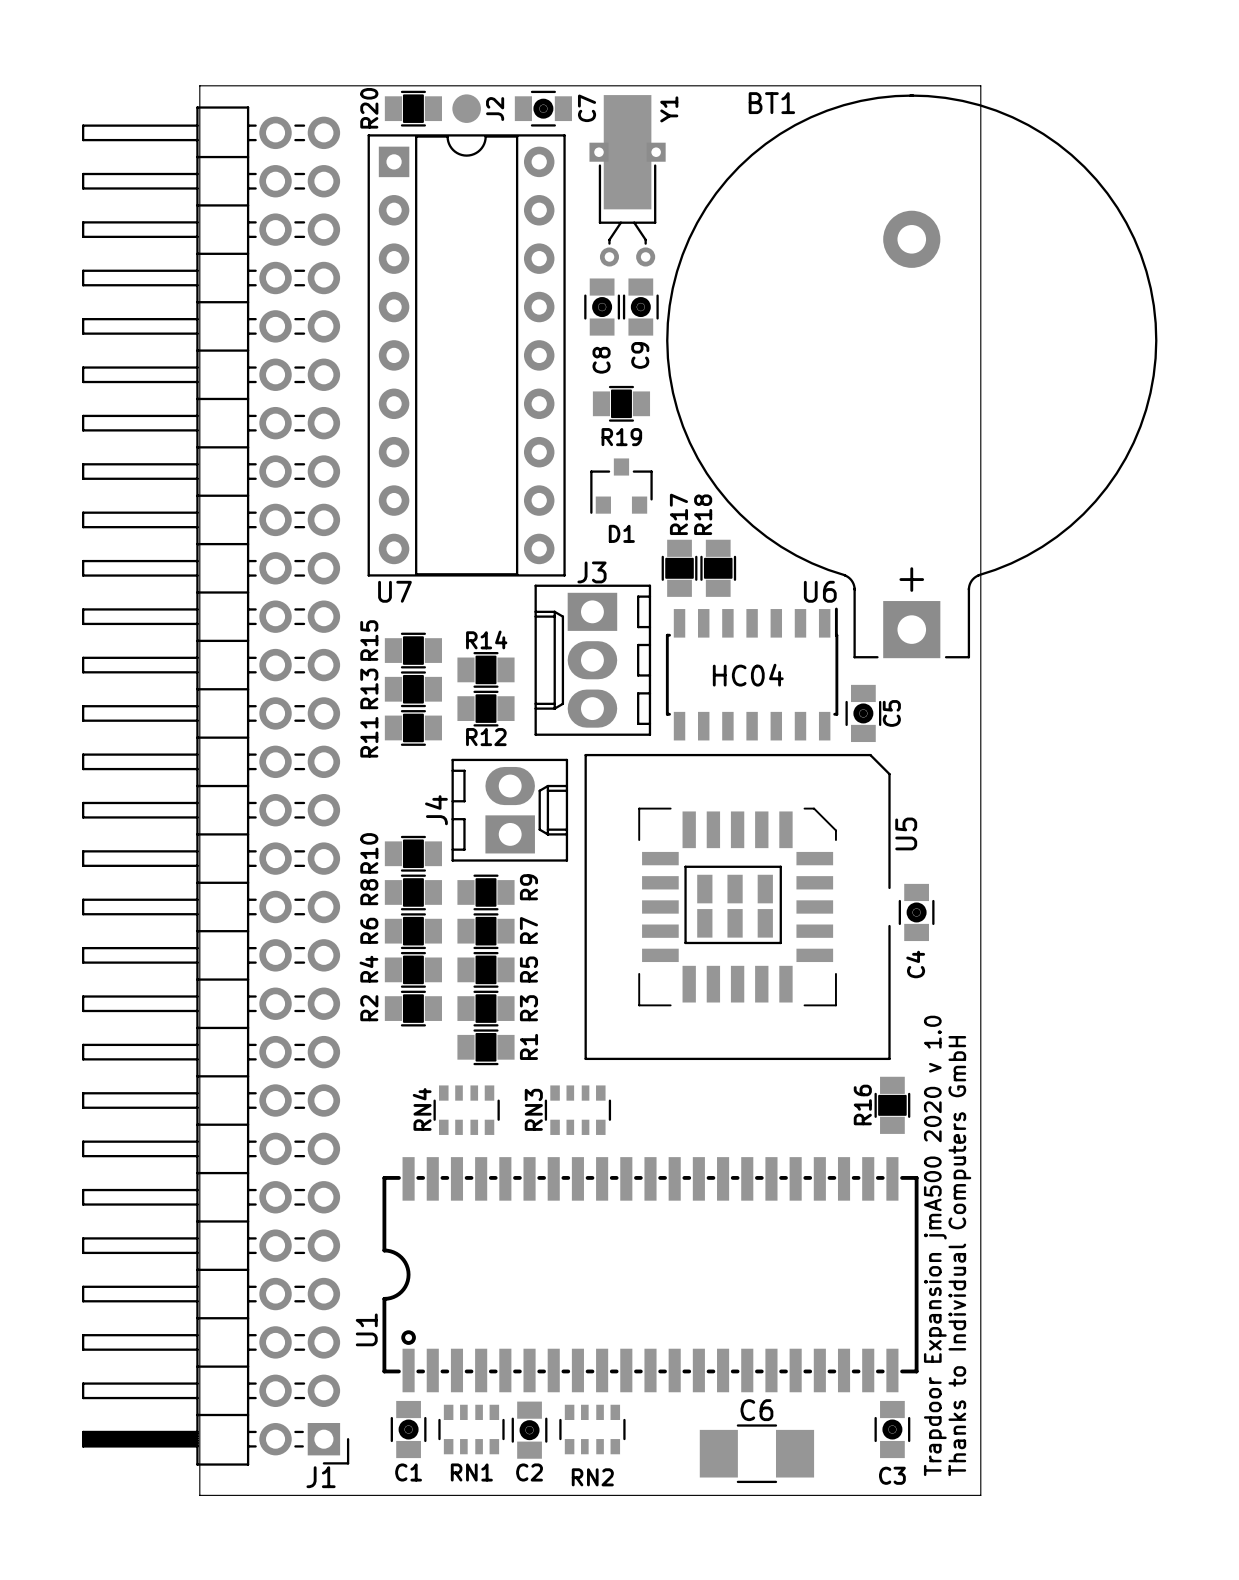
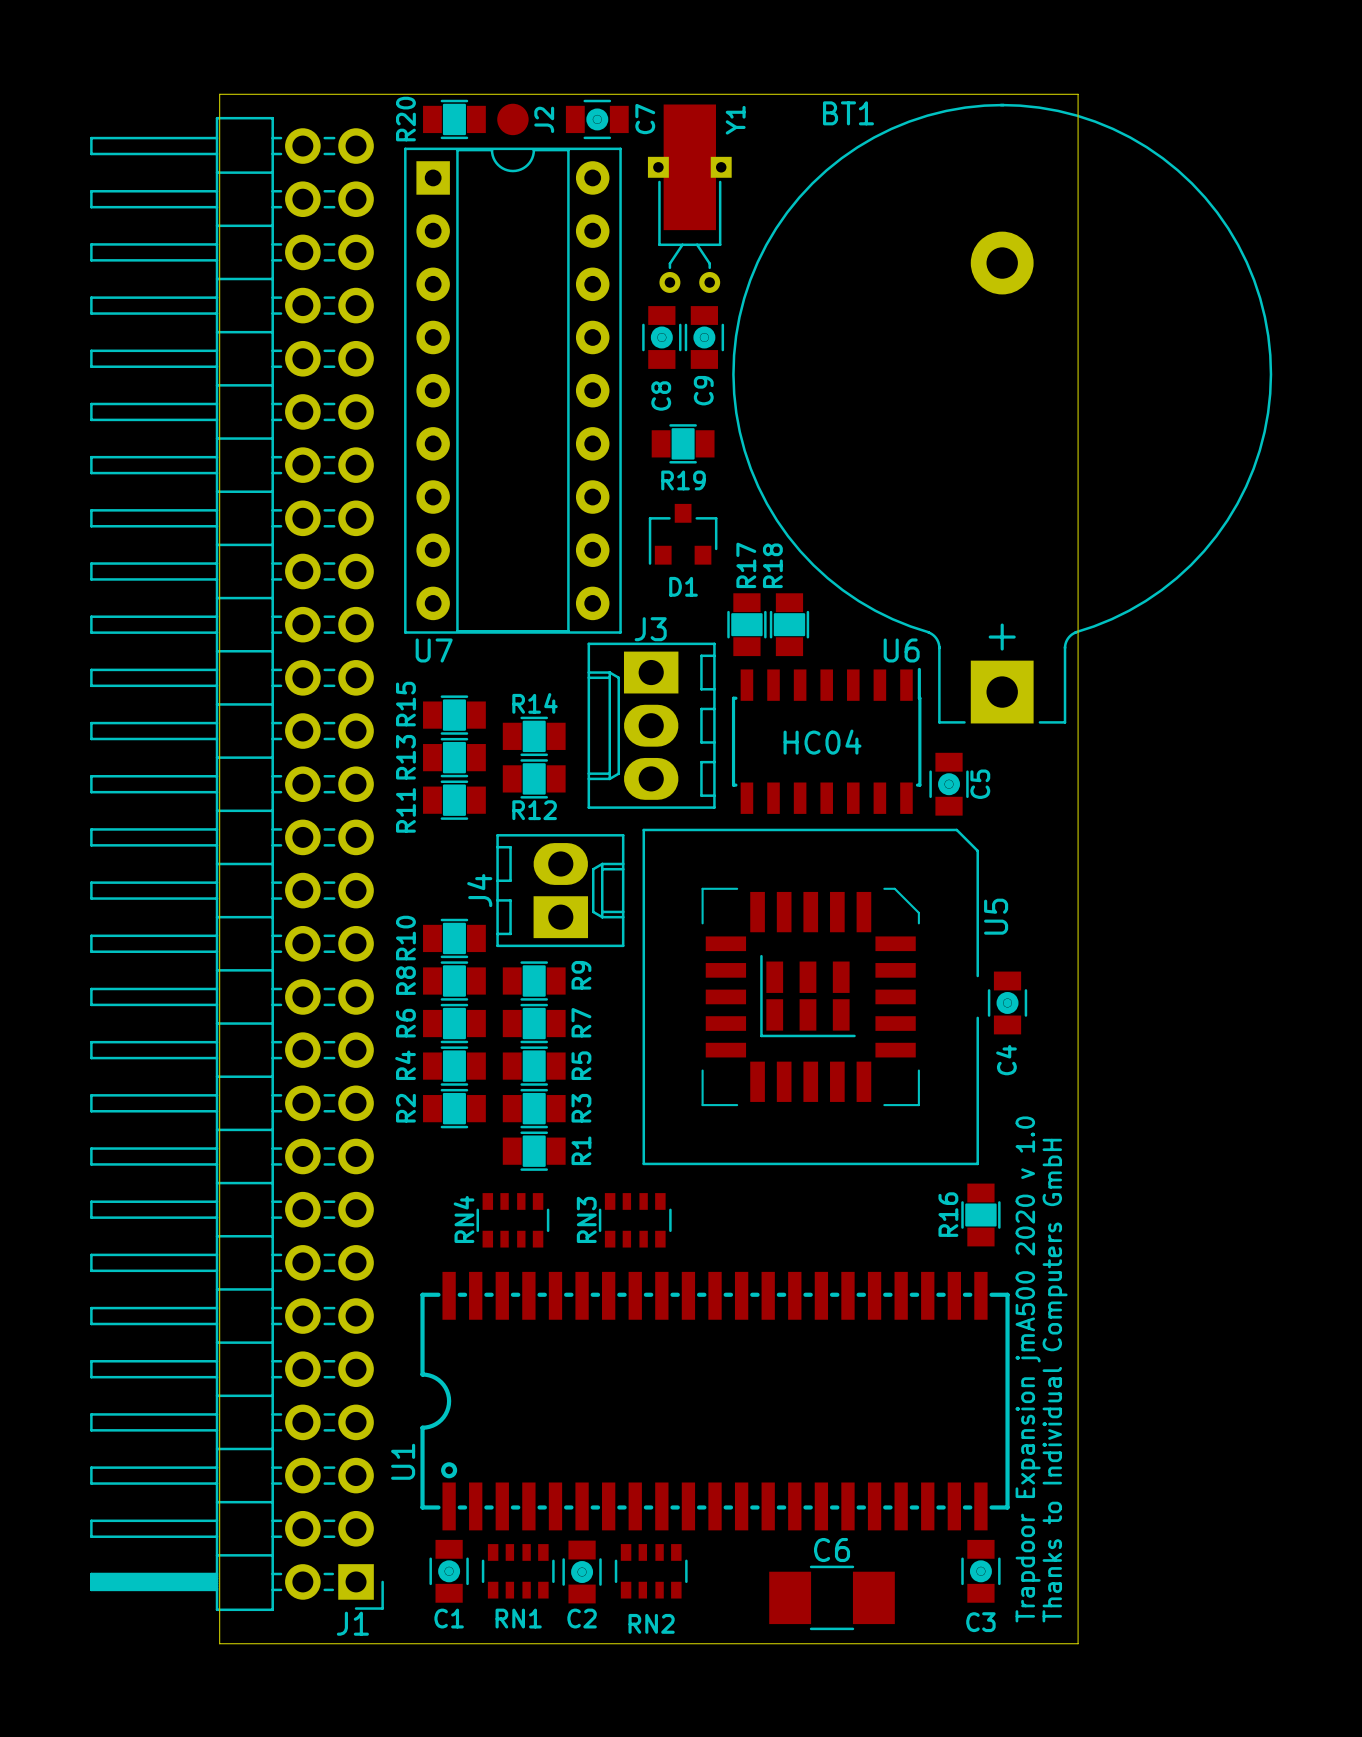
line: (685, 866) (685, 942) (780, 942) (780, 866) (685, 866) -> none
line: none -> (761, 956) (761, 1035) (854, 1035)

